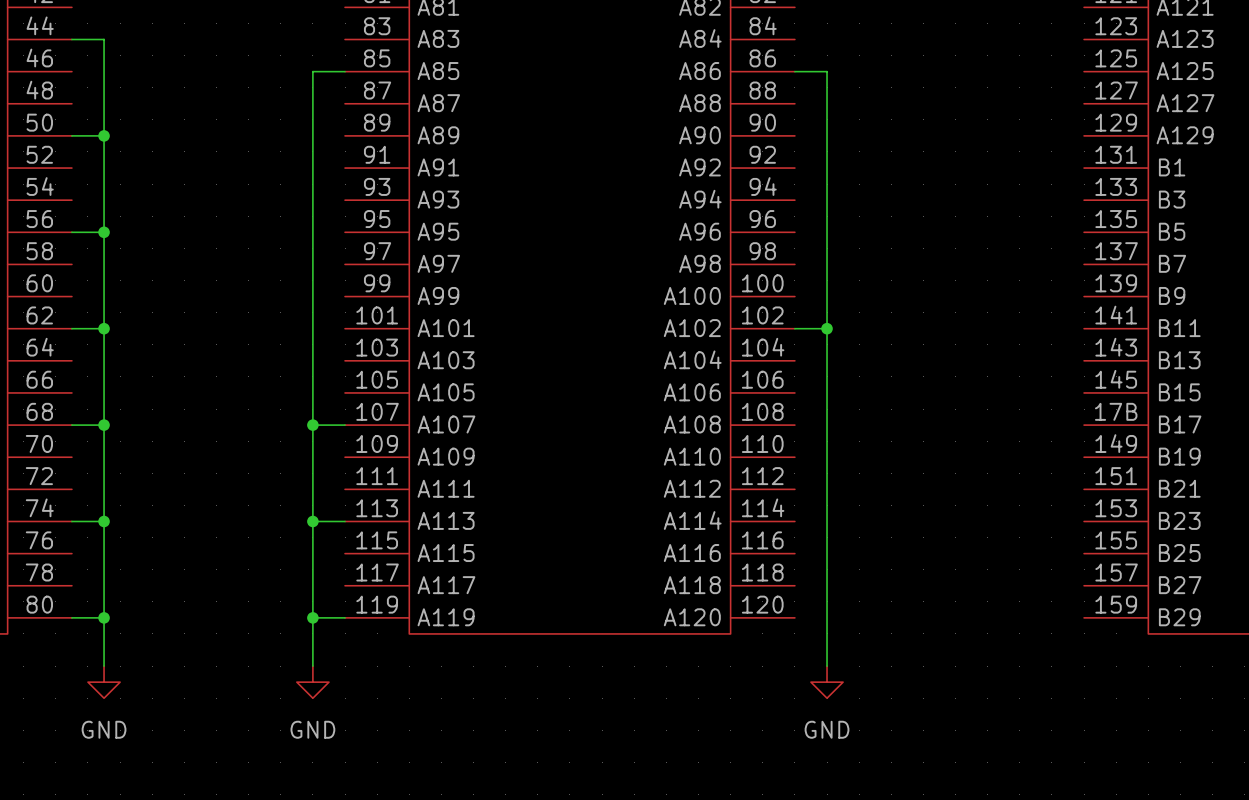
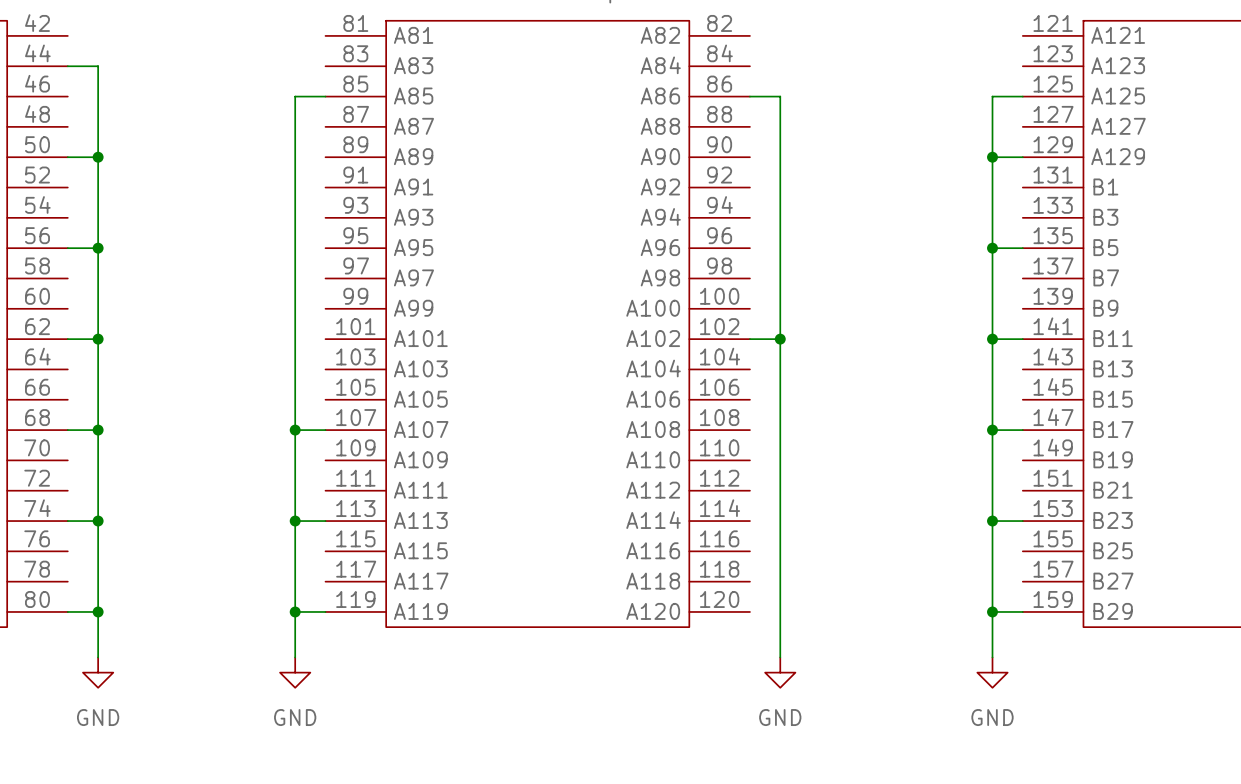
wire: none -> (1022, 96) (992, 96) (992, 657)
wire: none -> (992, 157) (1022, 157)
junction: none -> (992, 157)
wire: none -> (992, 248) (1022, 248)
junction: none -> (992, 248)
wire: none -> (992, 339) (1022, 339)
junction: none -> (992, 339)
part pin number: 17B (1116, 411) -> 147 (1053, 417)
wire: none -> (992, 430) (1022, 430)
junction: none -> (992, 430)
wire: none -> (992, 521) (1022, 521)
junction: none -> (992, 521)
wire: none -> (992, 611) (1022, 611)
junction: none -> (992, 611)
power symbol: none -> GND (992, 672)

